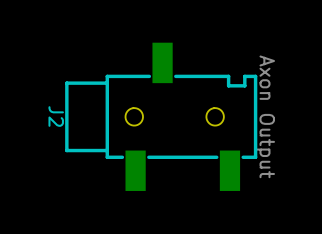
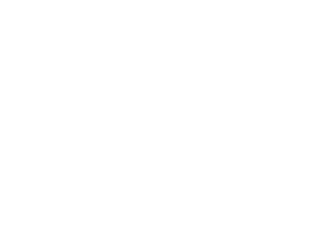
J2: Axon Output (161, 116) -> none

